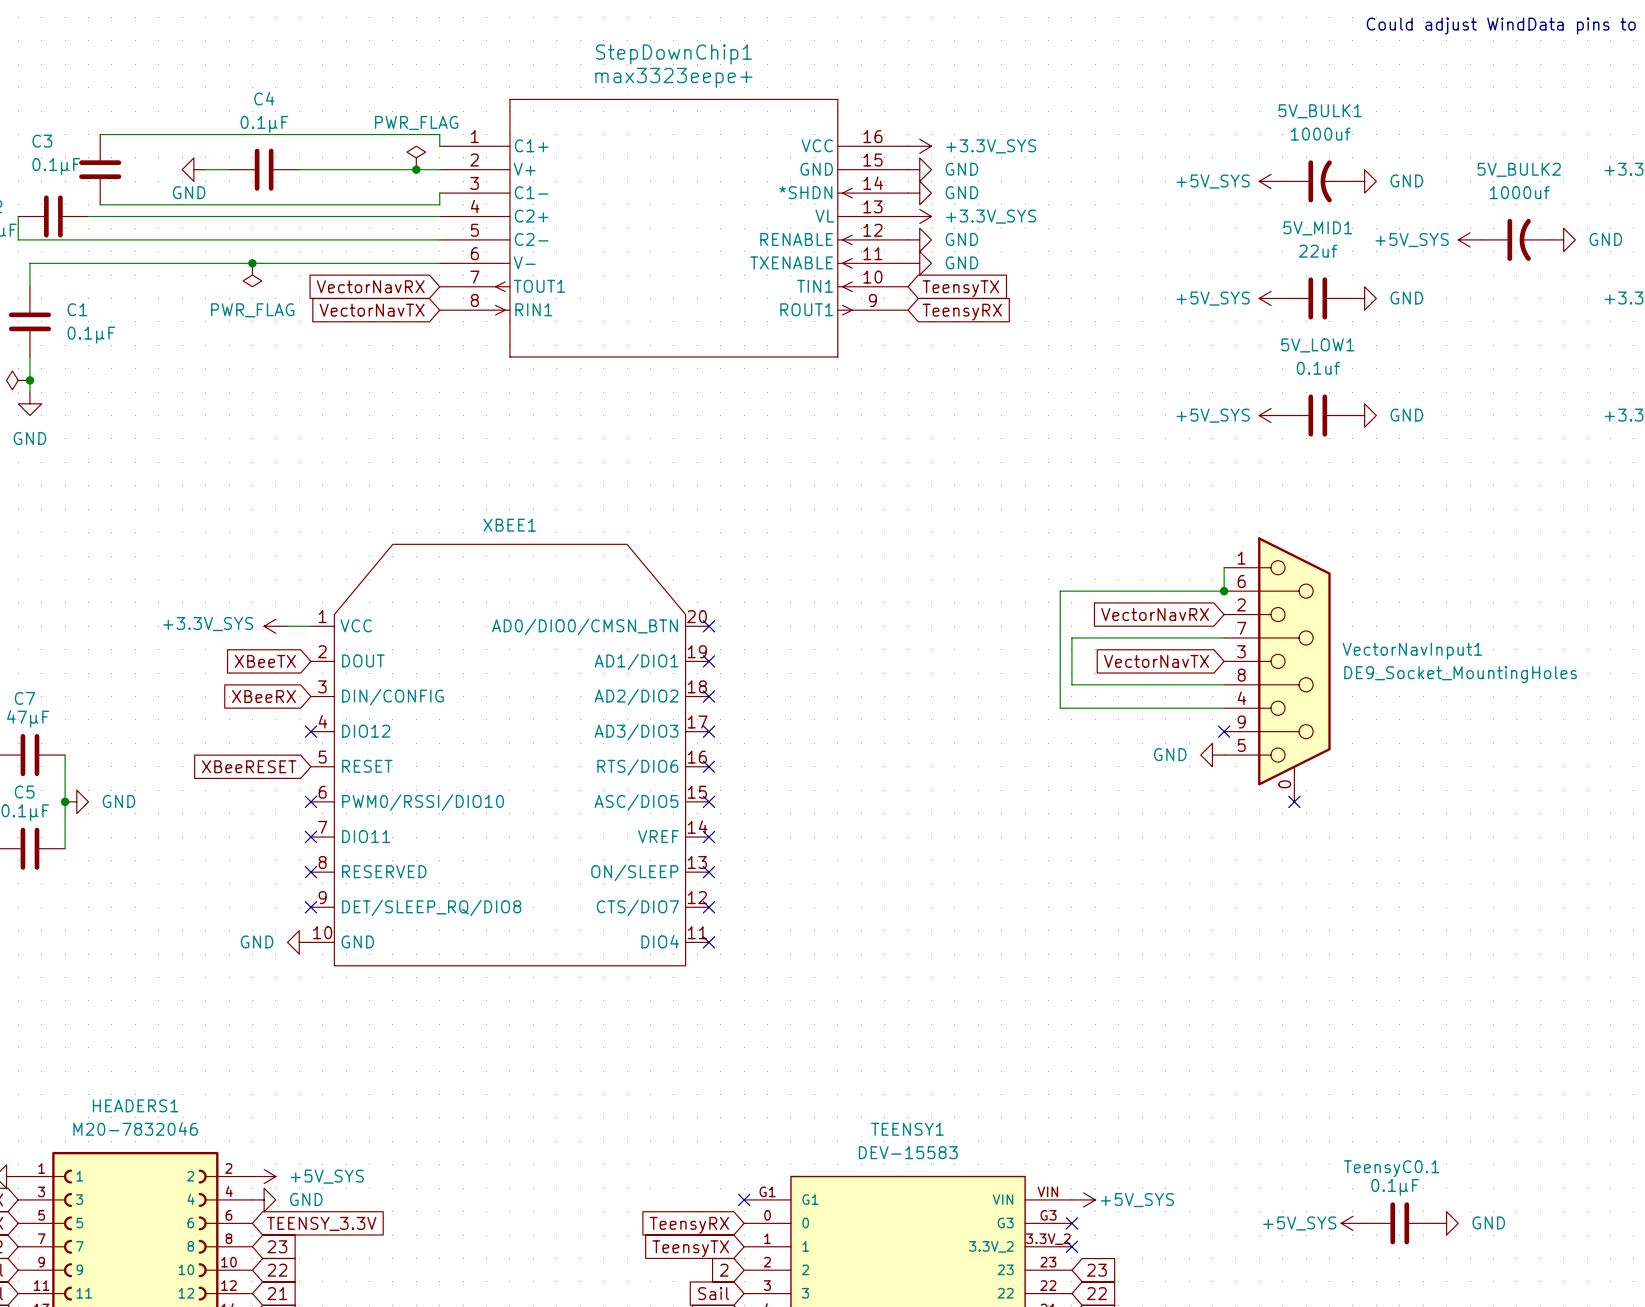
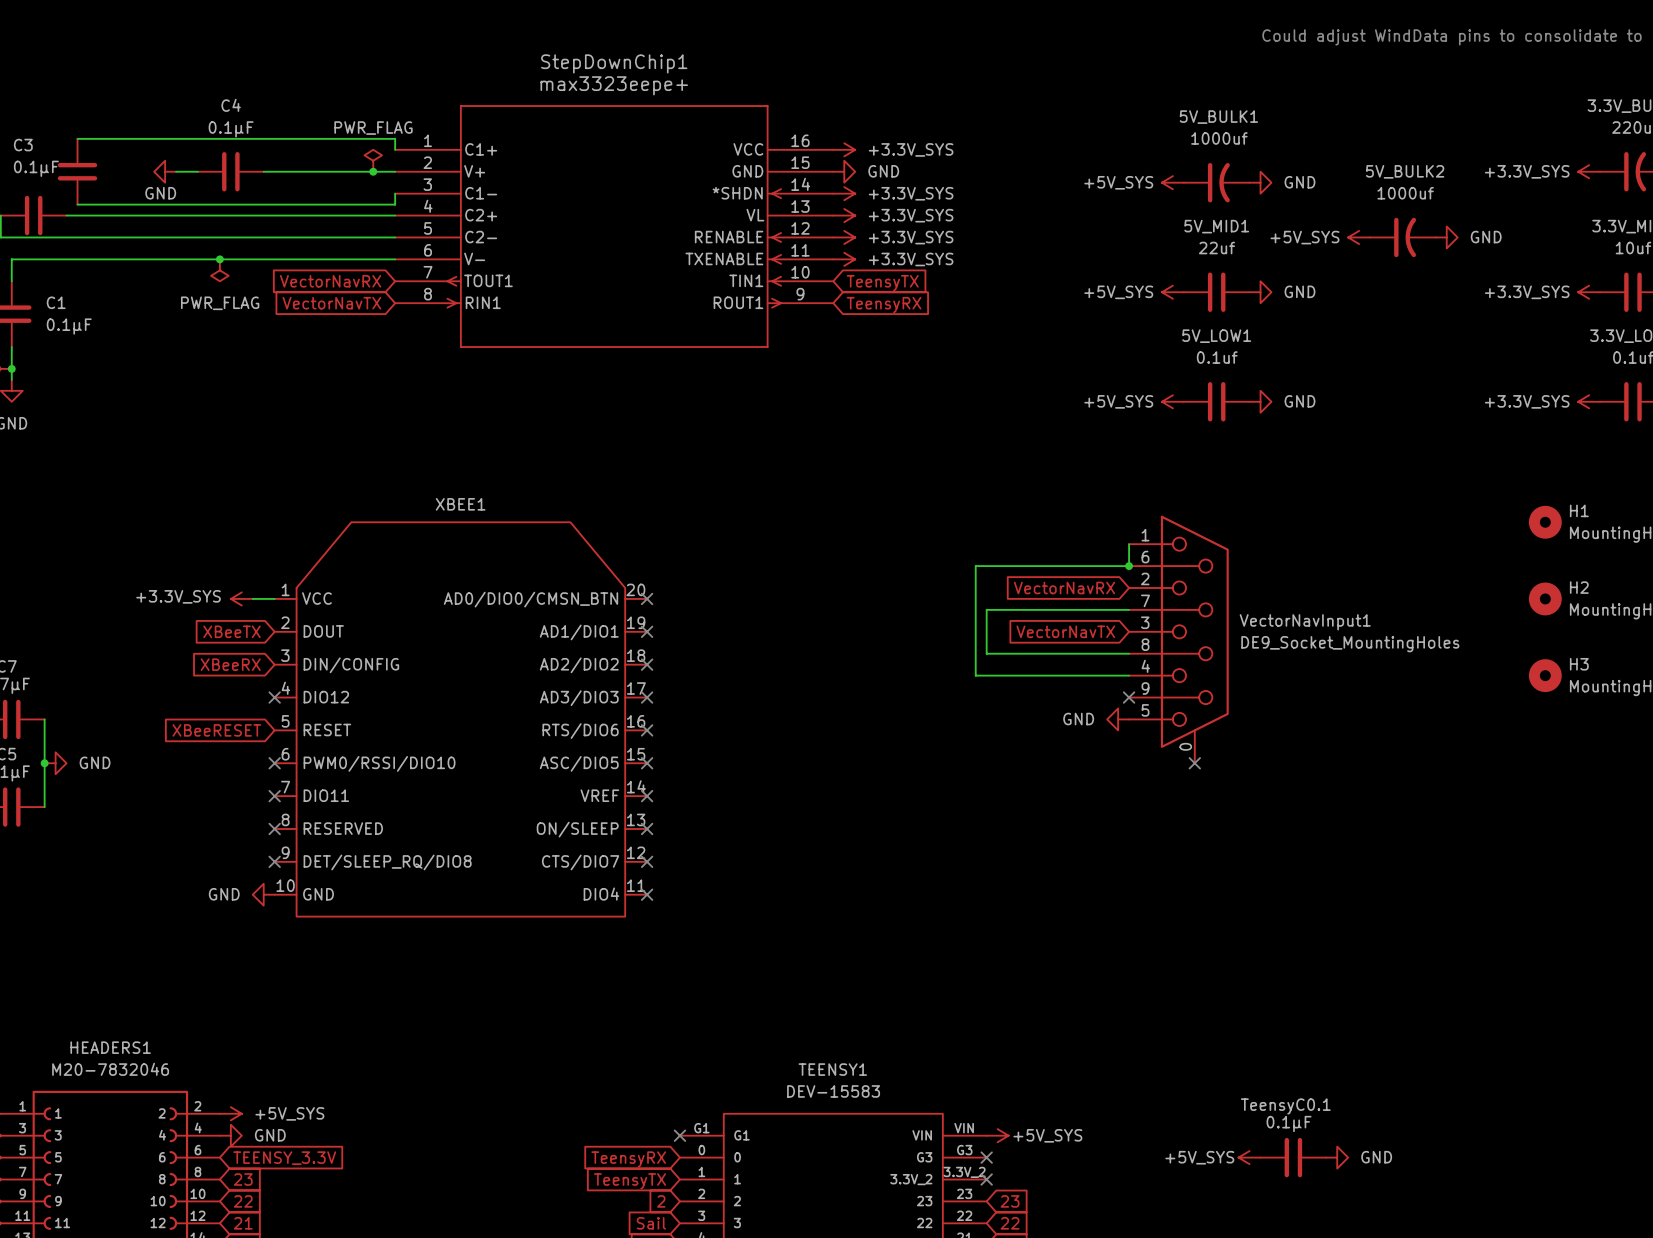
power symbol: GND (919, 193) -> +3.3V_SYS (844, 193)
power symbol: GND (919, 239) -> +3.3V_SYS (844, 237)
power symbol: GND (919, 263) -> +3.3V_SYS (844, 259)

